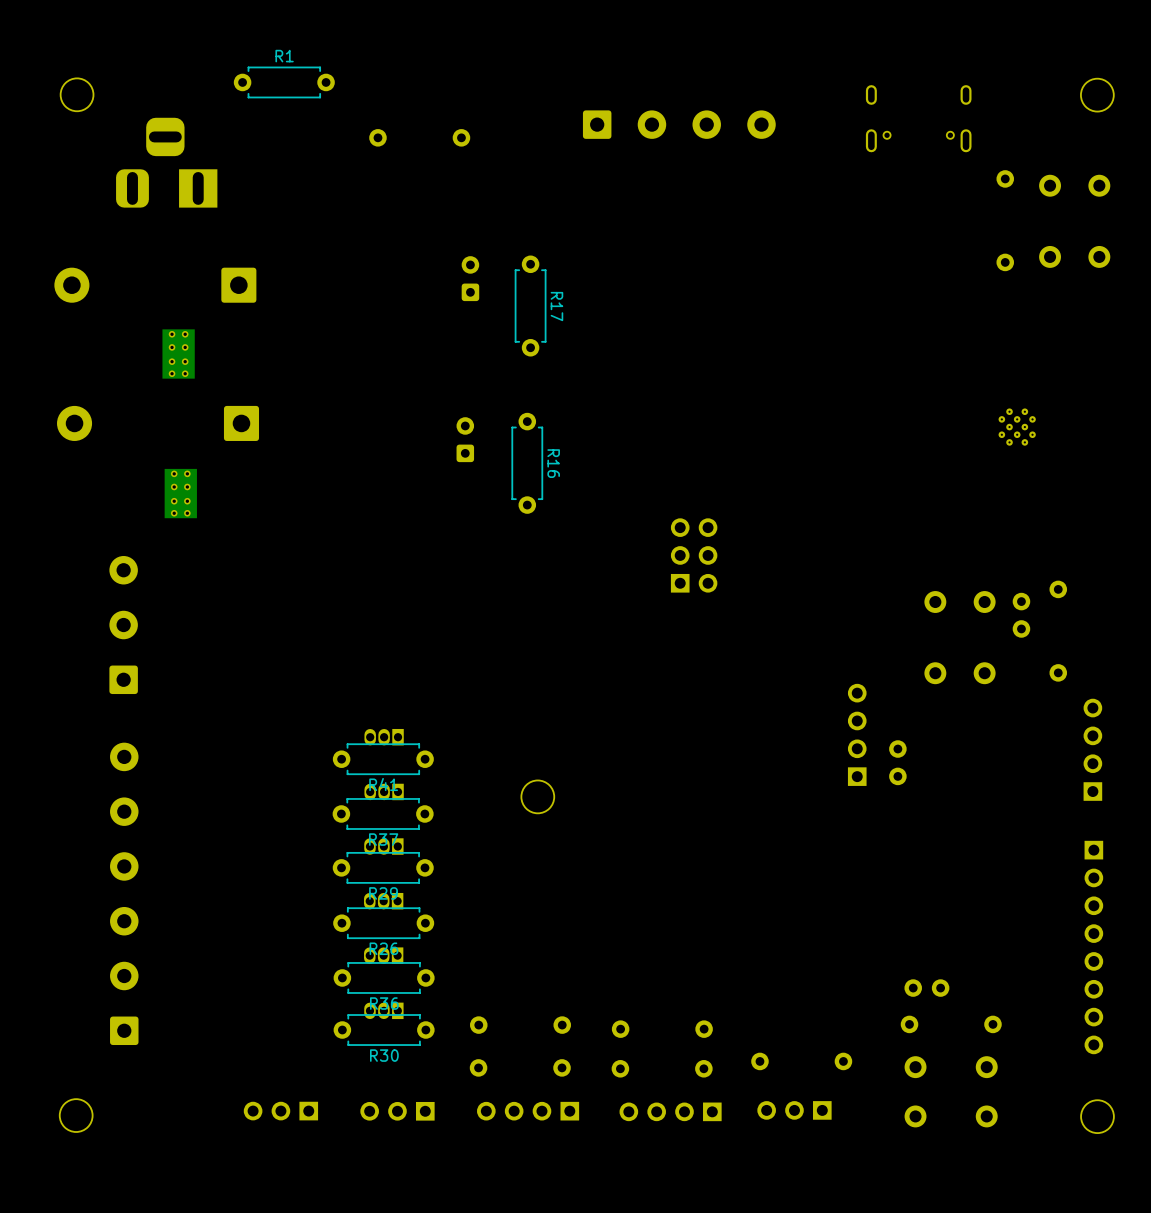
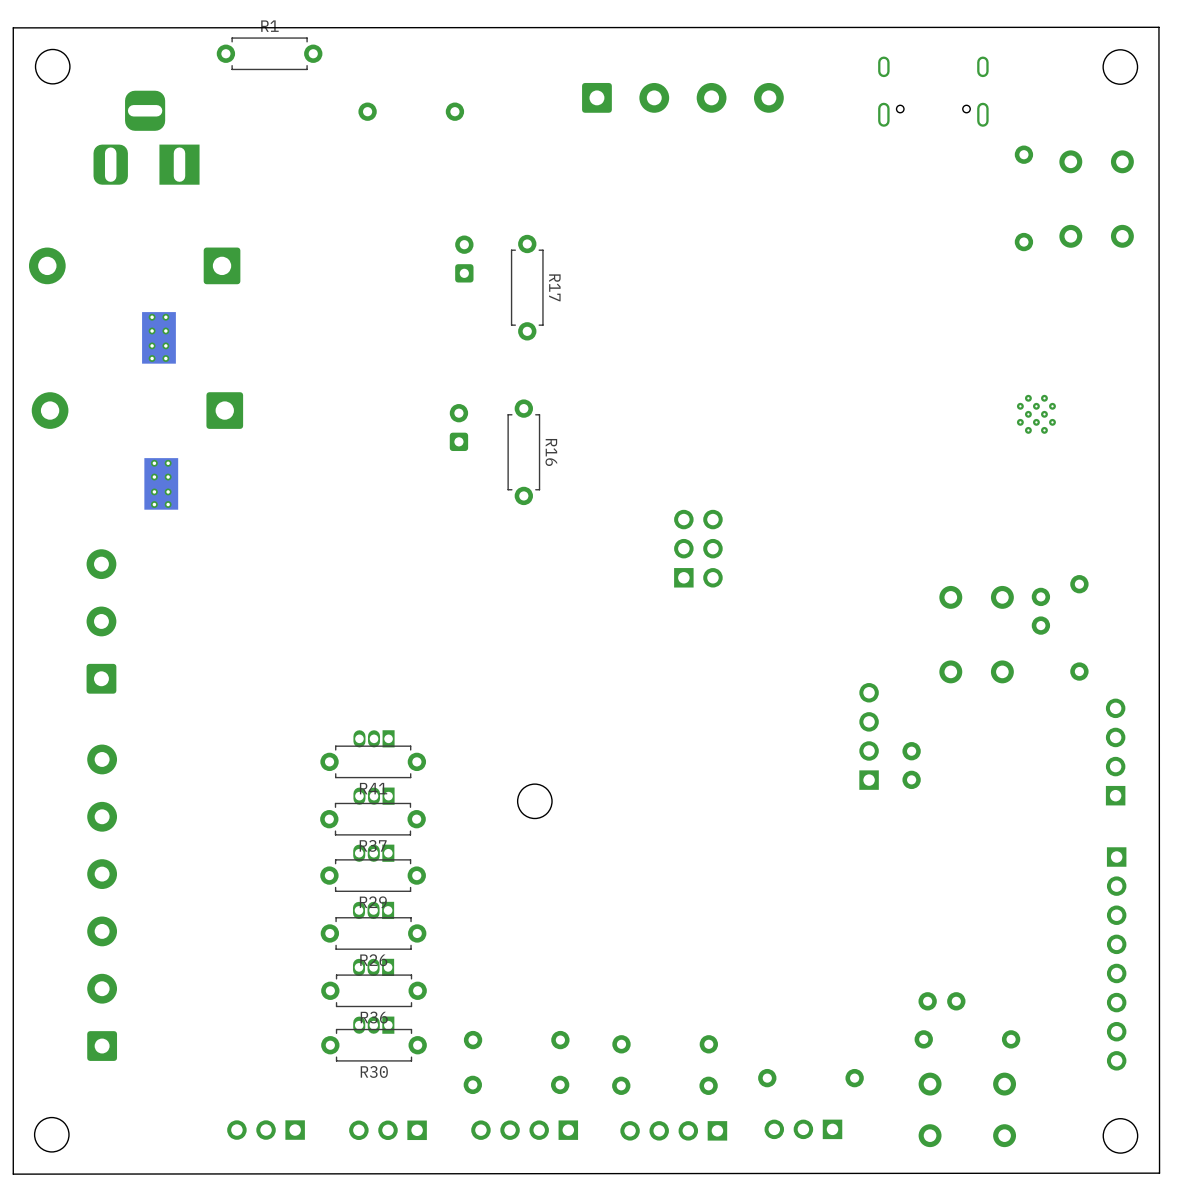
board edge: none -> (1158, 27) (1159, 1173) (13, 1174) (13, 27) (1158, 27)

